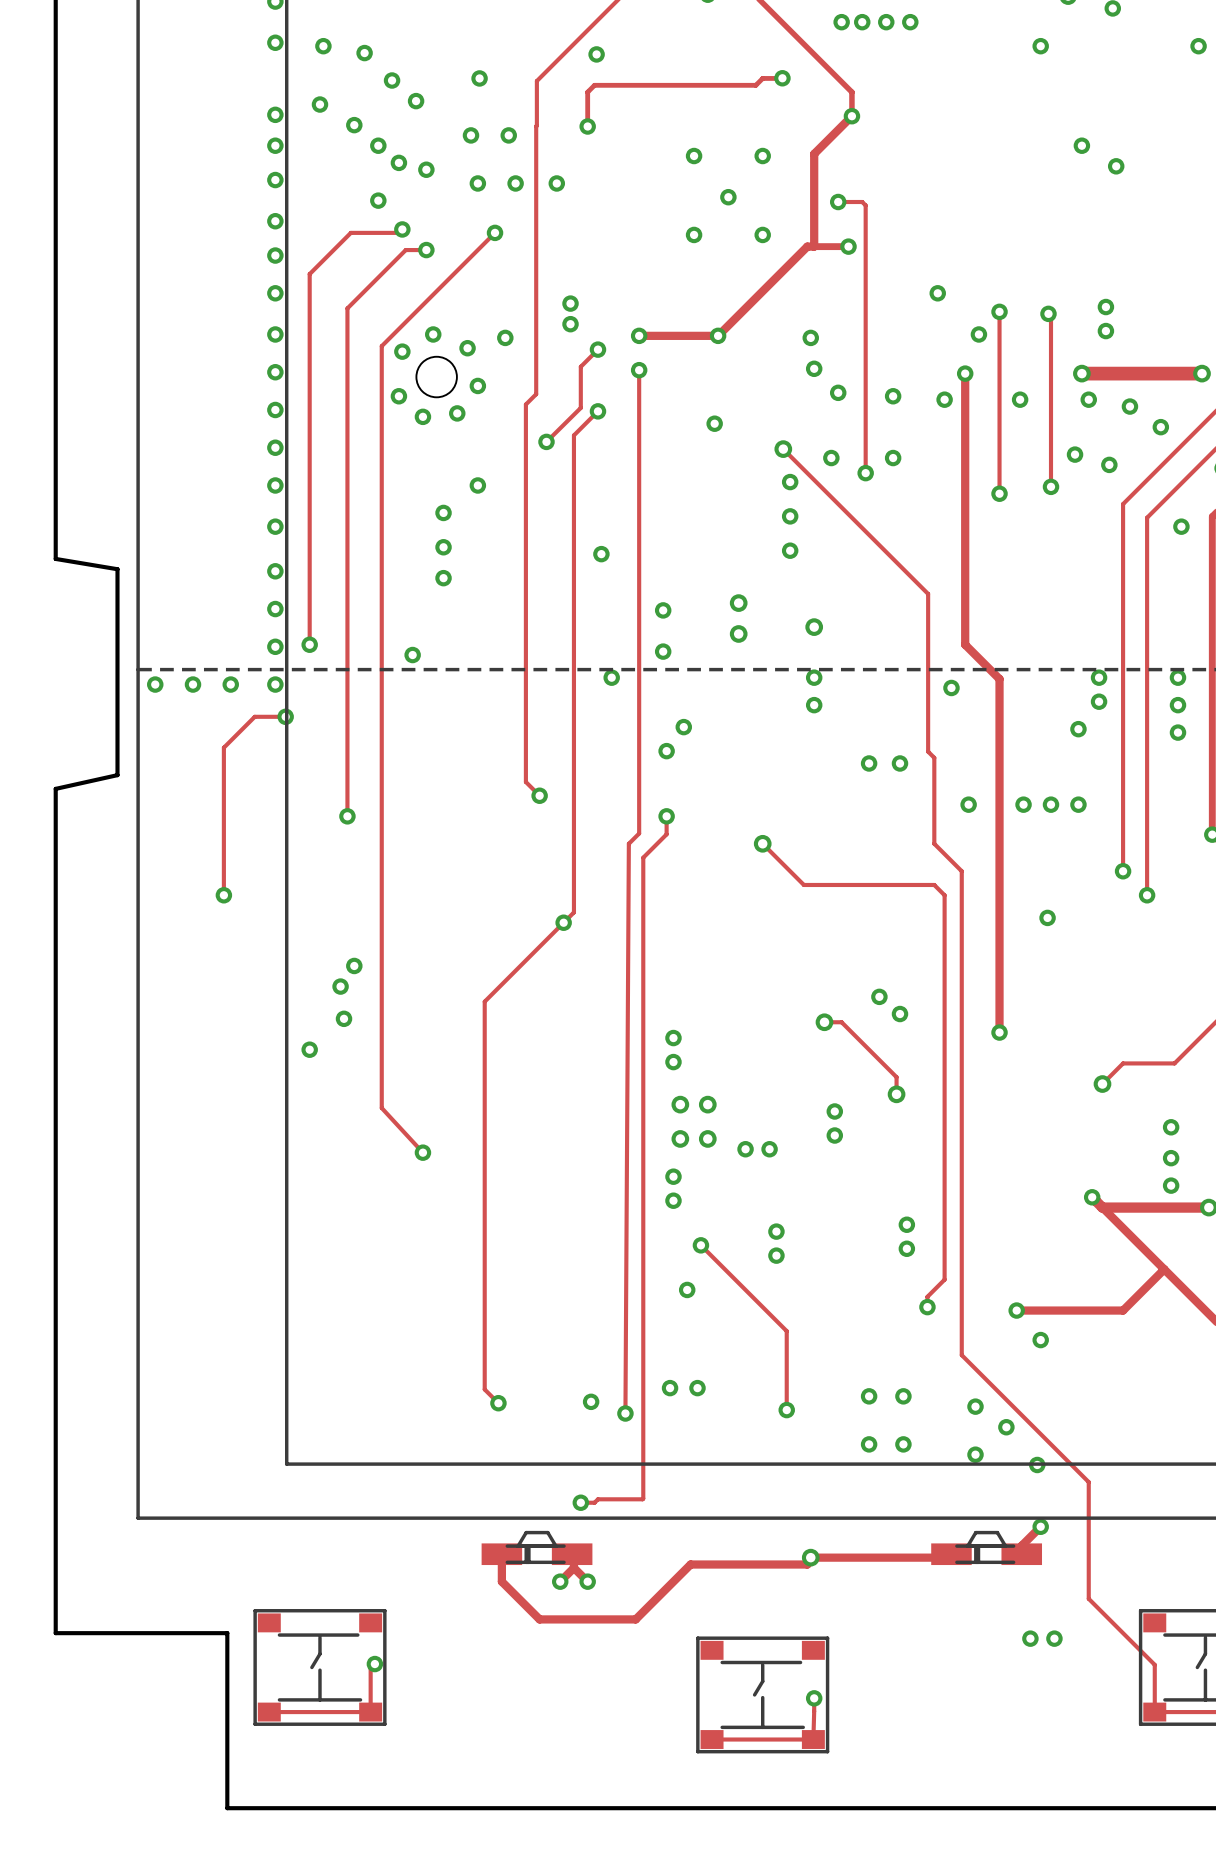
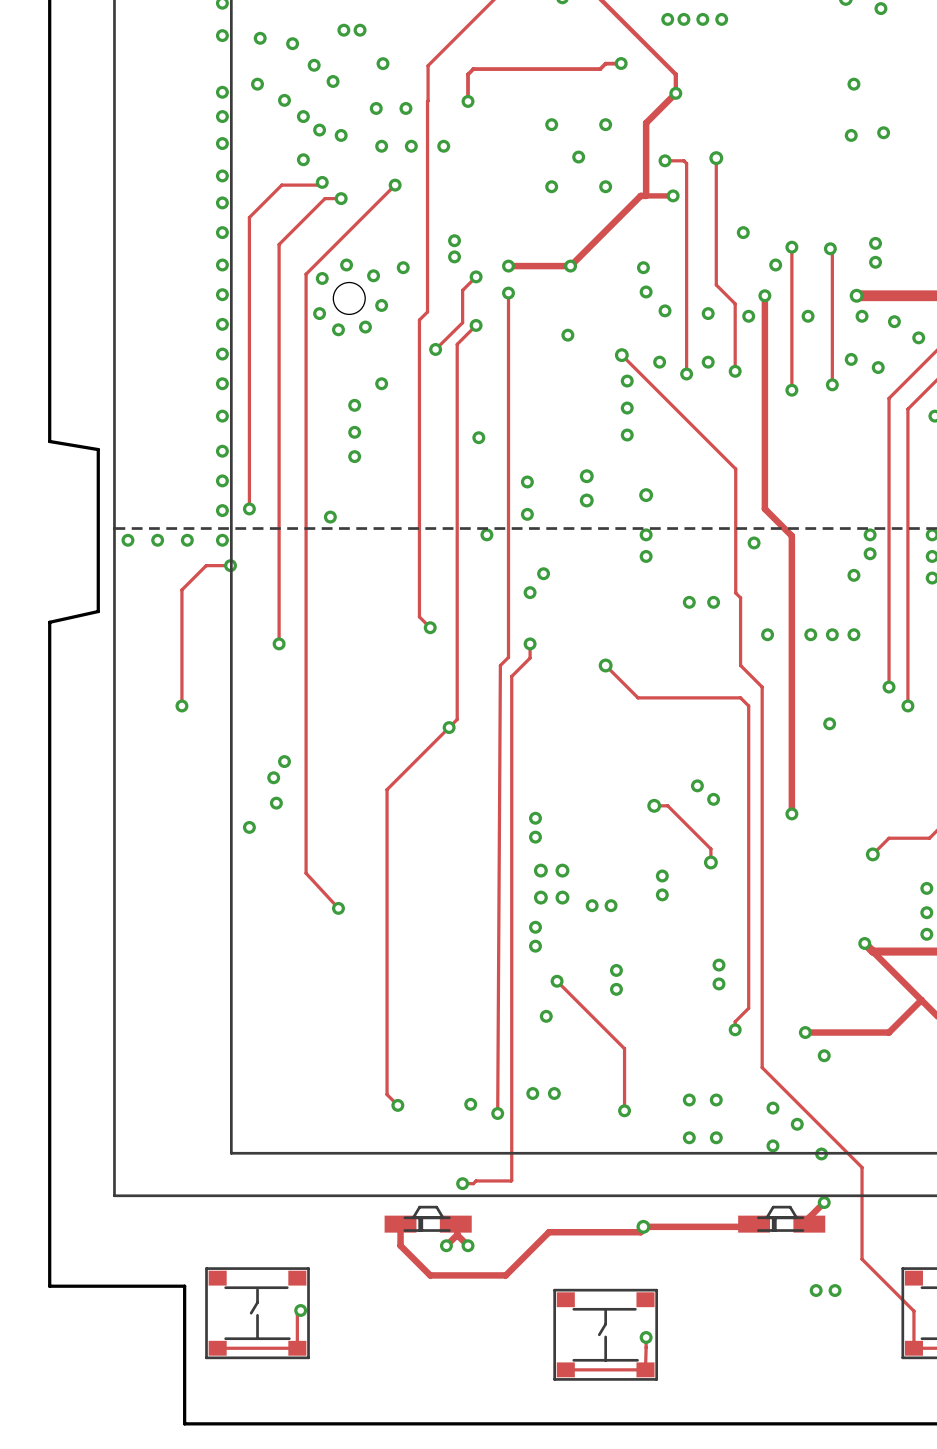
via: none -> (343, 30)
via: none -> (360, 30)
via: (1040, 46) -> none
via: (596, 54) -> none
via: none -> (853, 84)
via: (1081, 145) -> none
via: none -> (851, 135)
track: none -> (716, 158) (716, 284) (735, 303) (735, 371)
via: none -> (716, 158)
via: none -> (735, 371)

